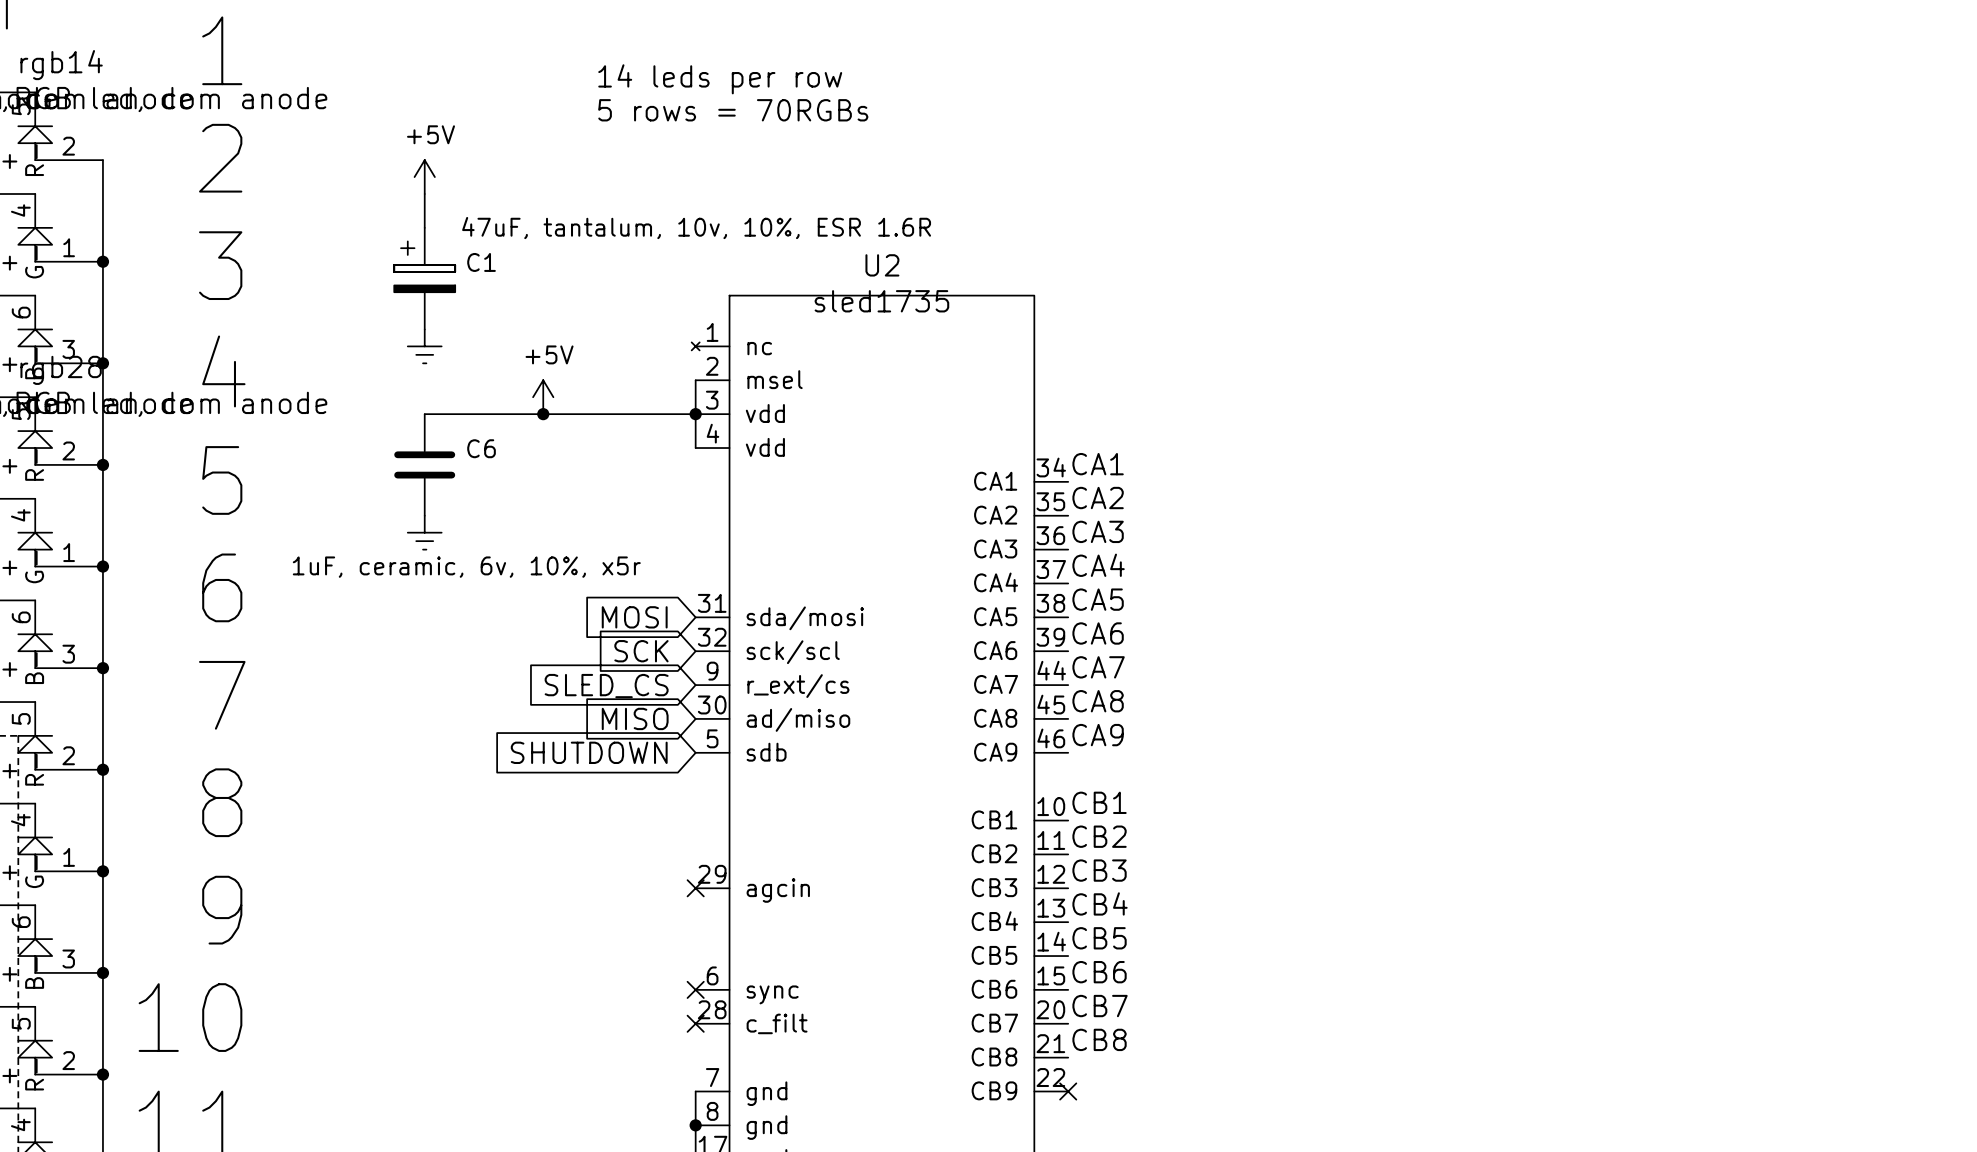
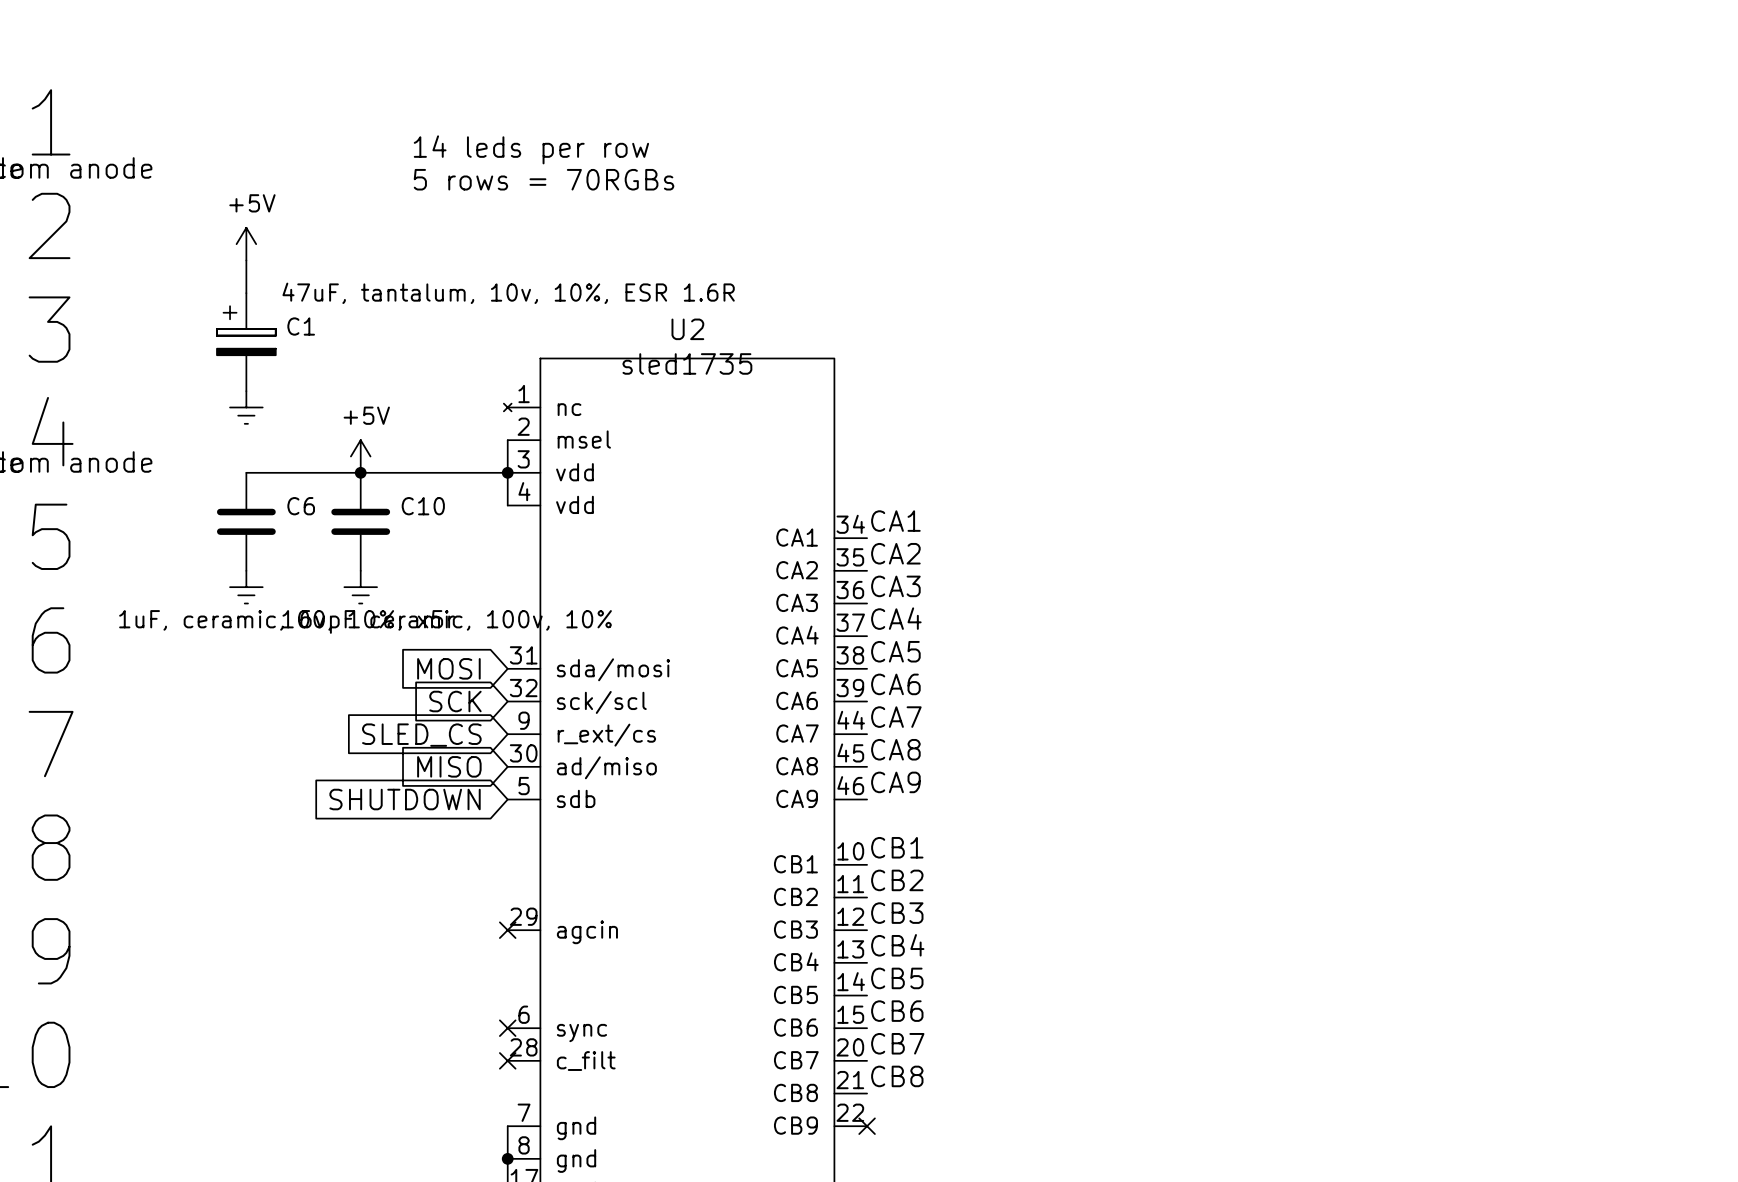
C10: none -> 100pF ceramic, 100v, 10% (360, 521)
power symbol: none -> (360, 587)

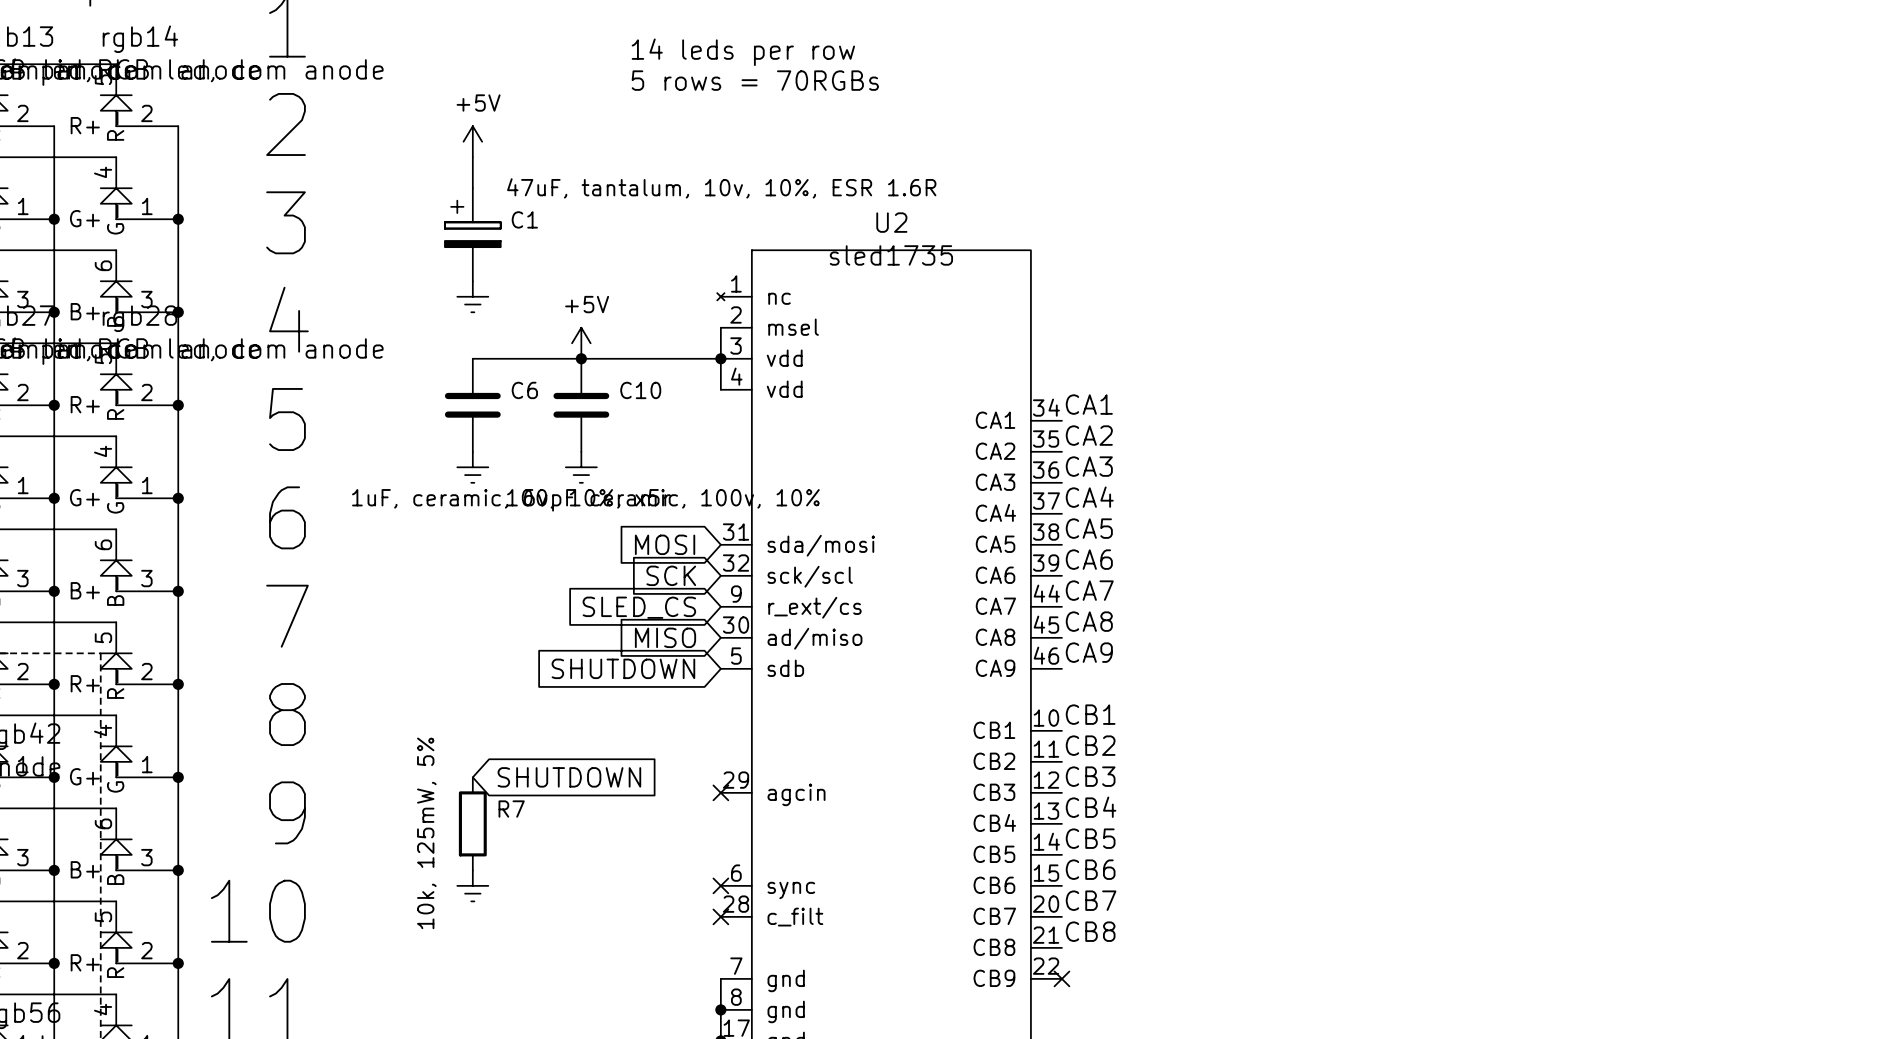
global label: none -> SHUTDOWN (569, 777)
R7: none -> 10k, 125mW, 5% (472, 823)
power symbol: none -> (472, 885)

